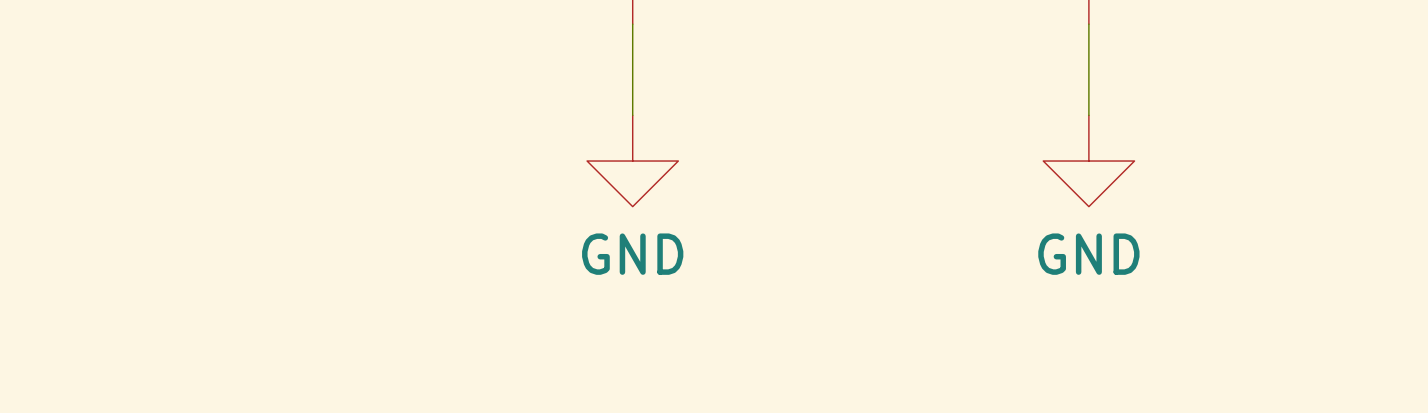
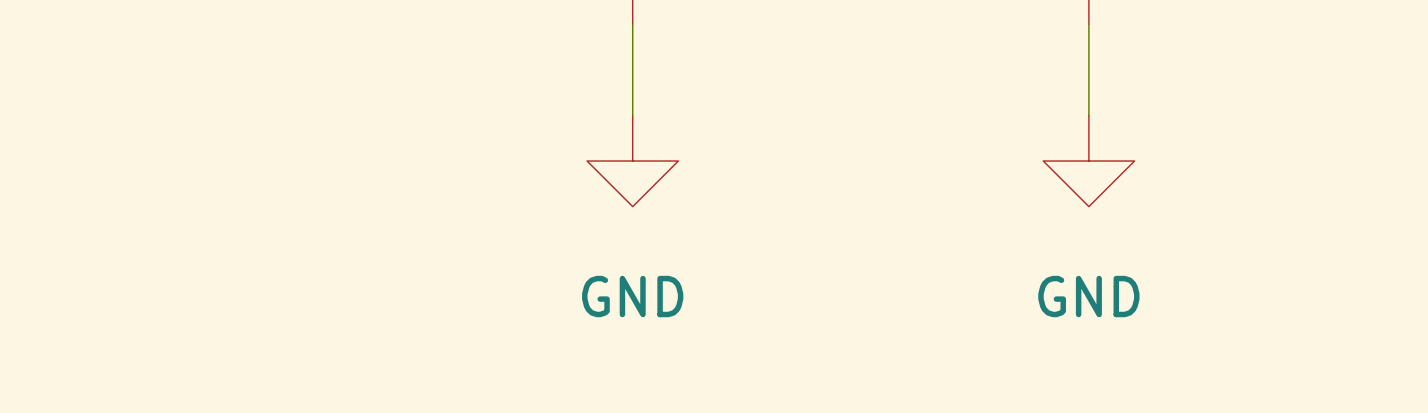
power symbol text position: GND (632, 254) -> GND (632, 296)
power symbol text position: GND (1088, 254) -> GND (1088, 296)

